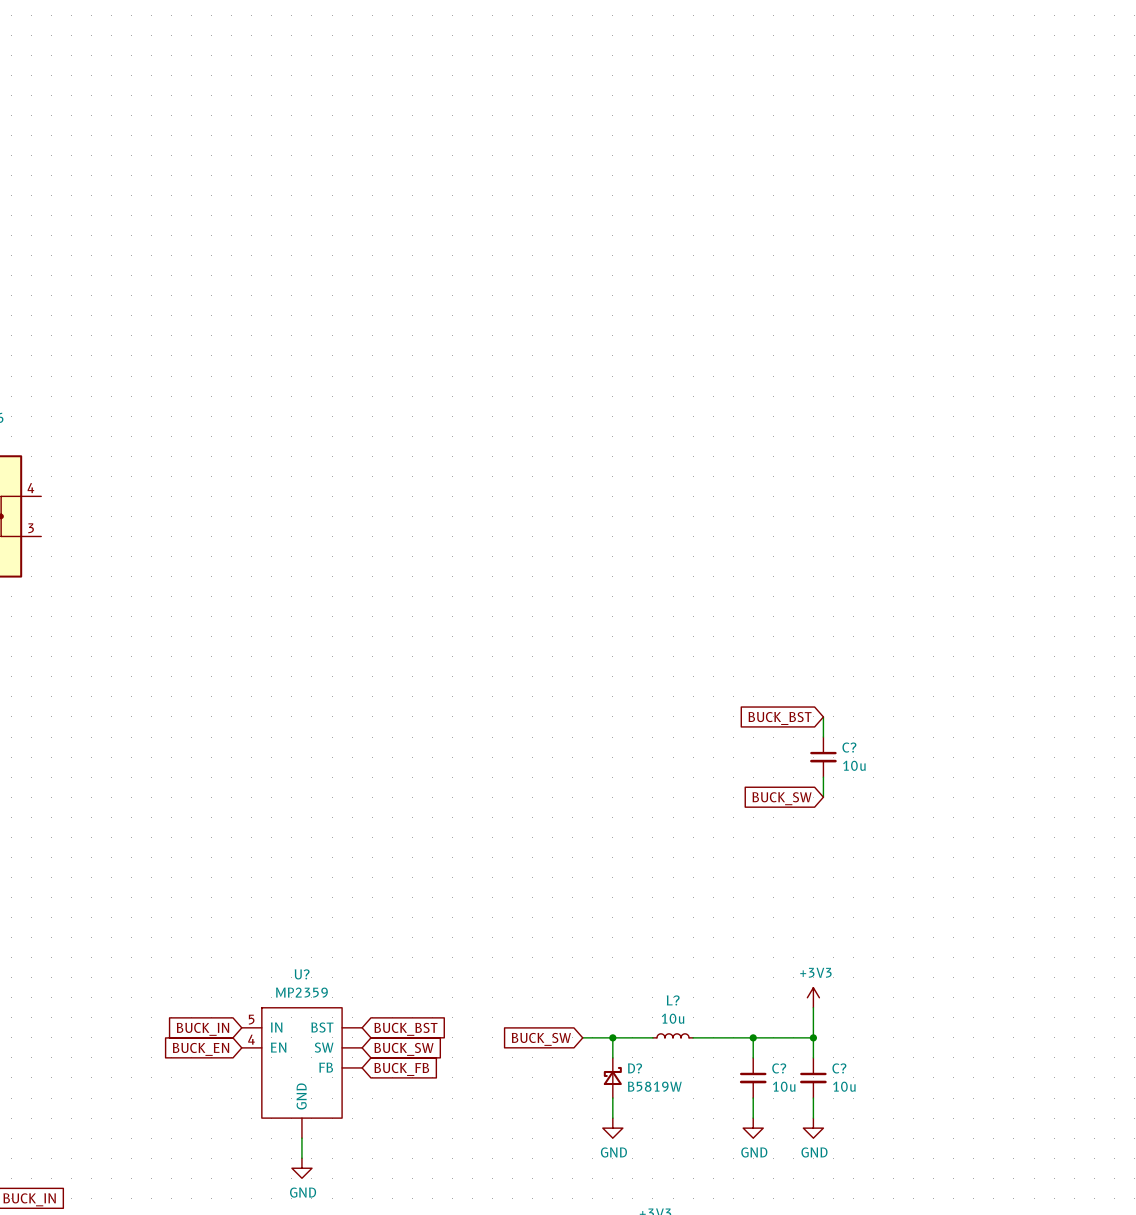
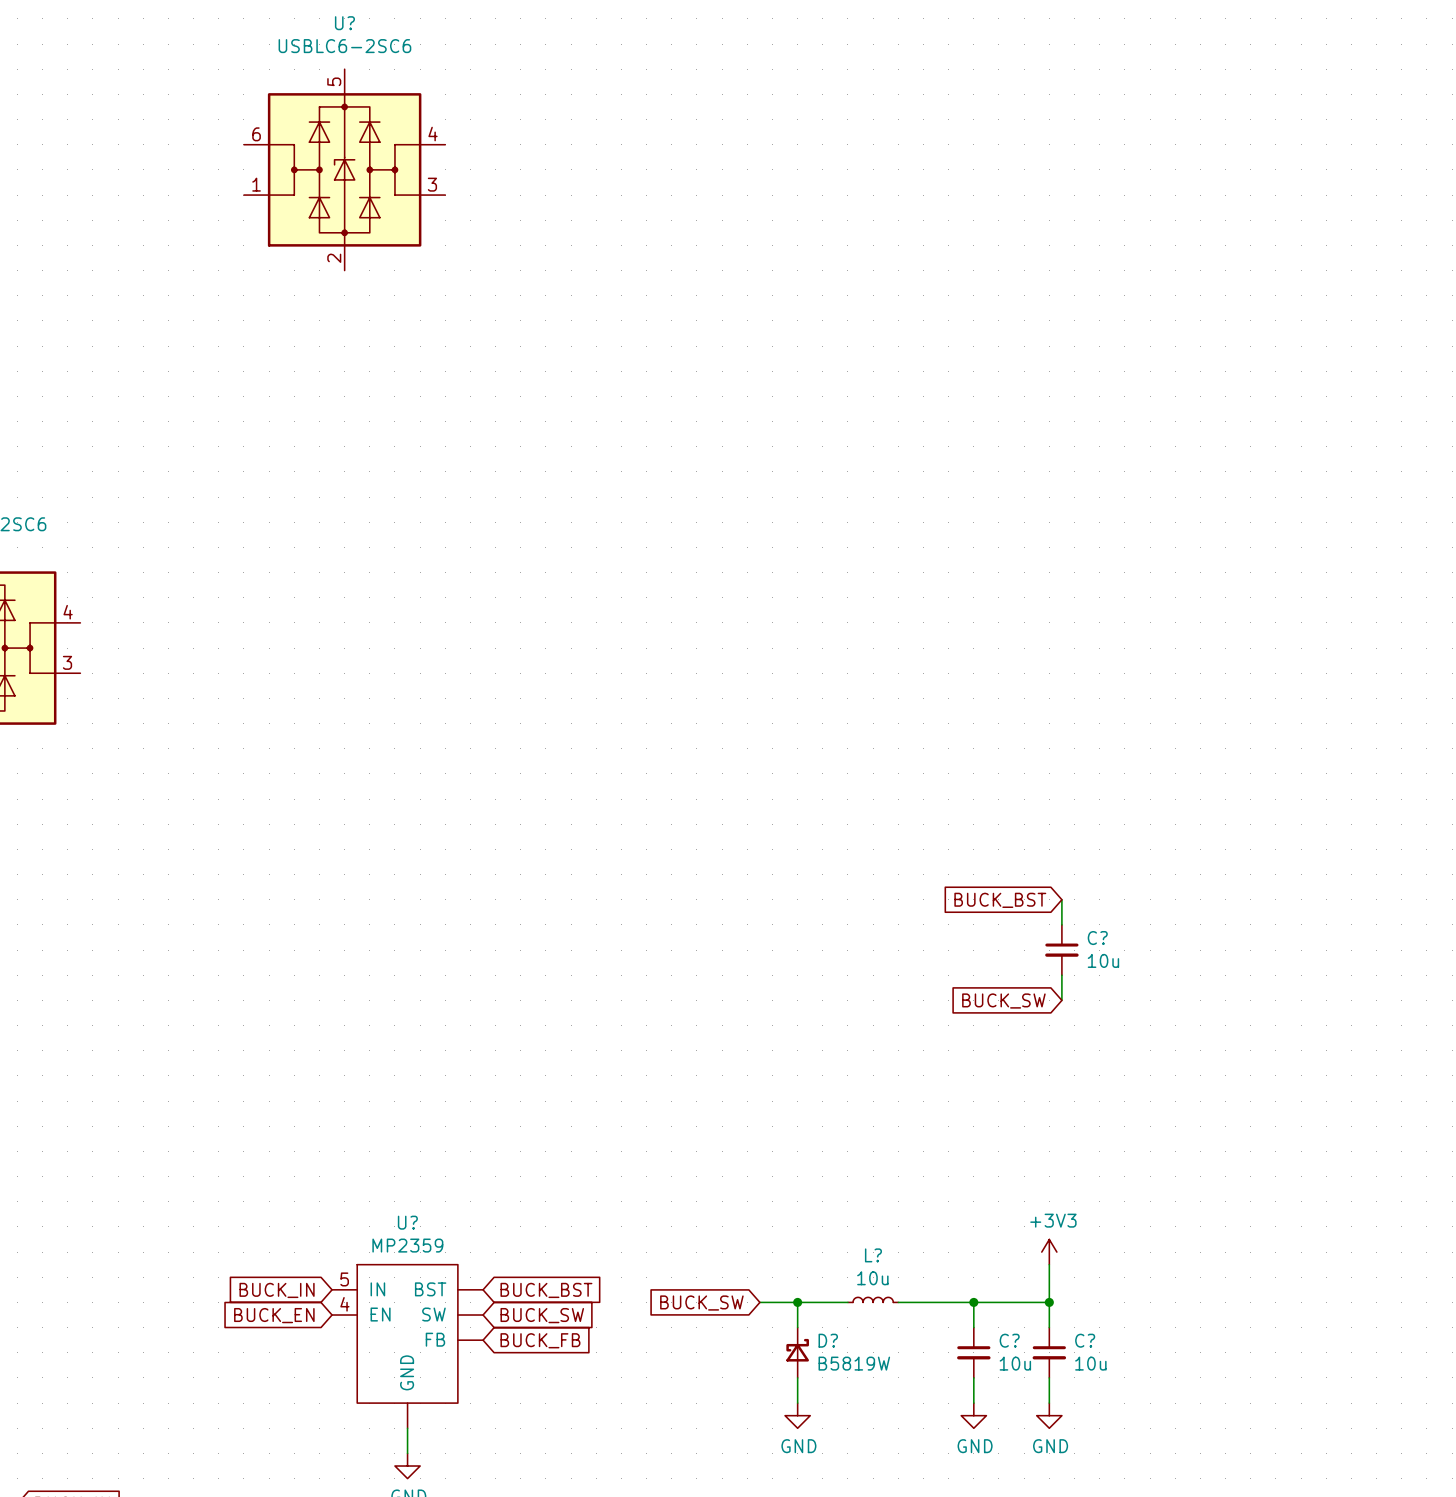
U?: none -> USBLC6-2SC6 (344, 169)

